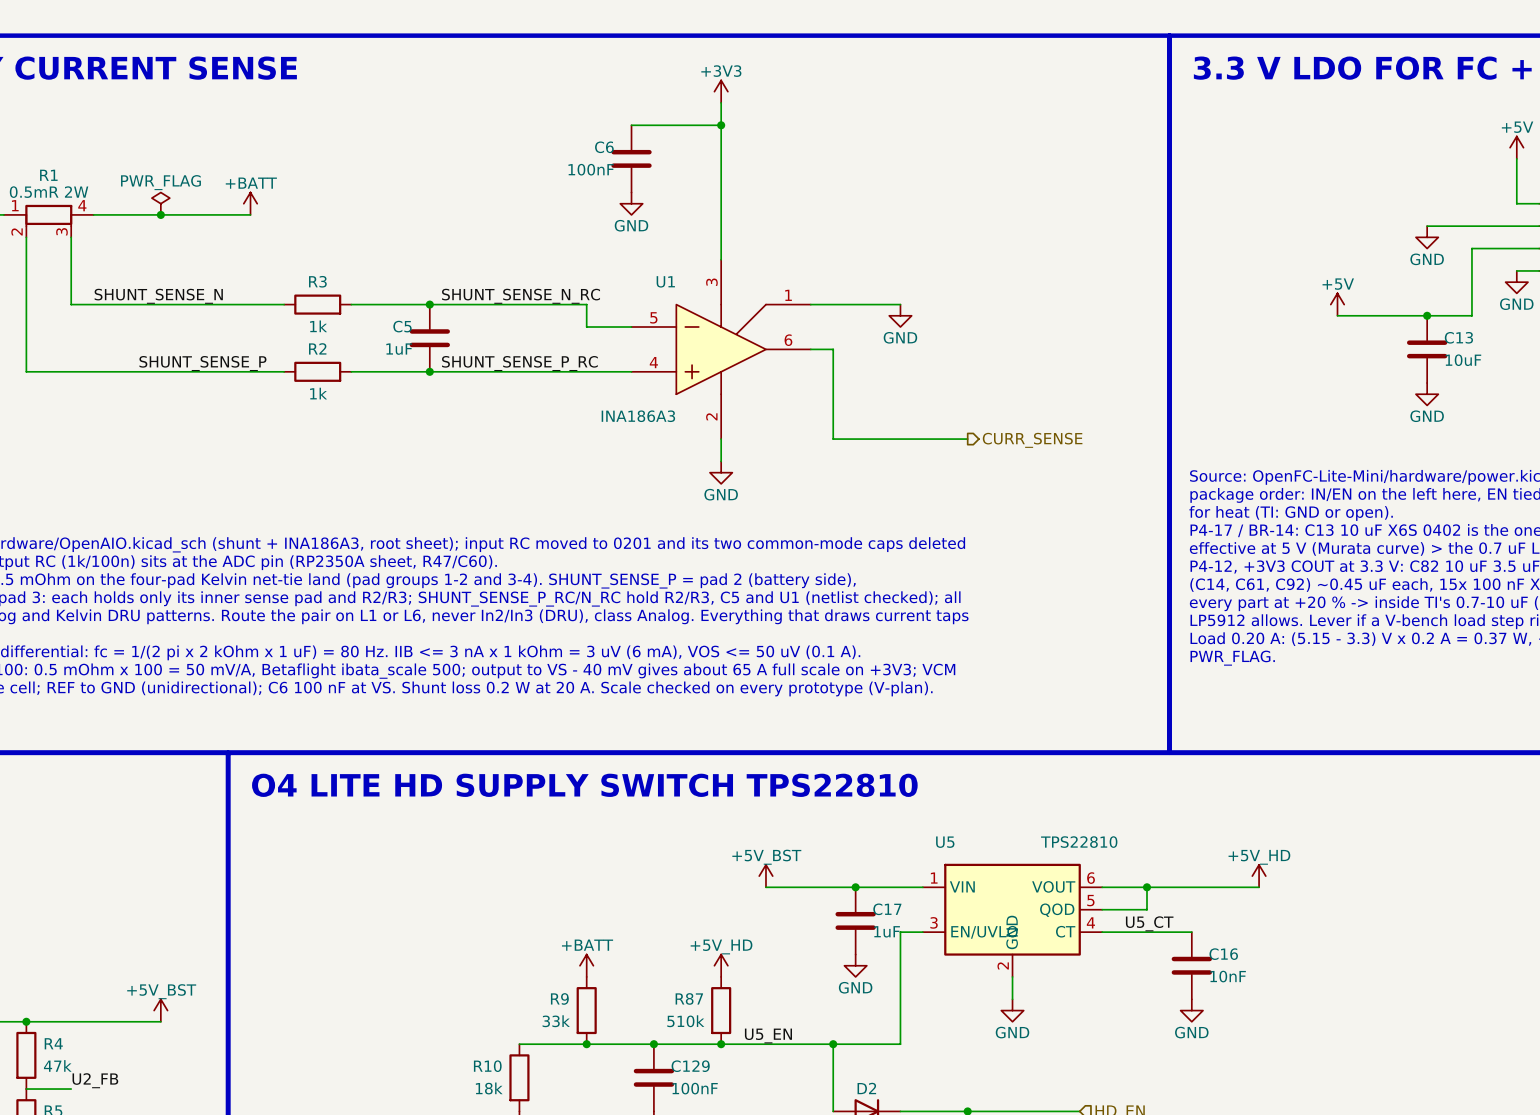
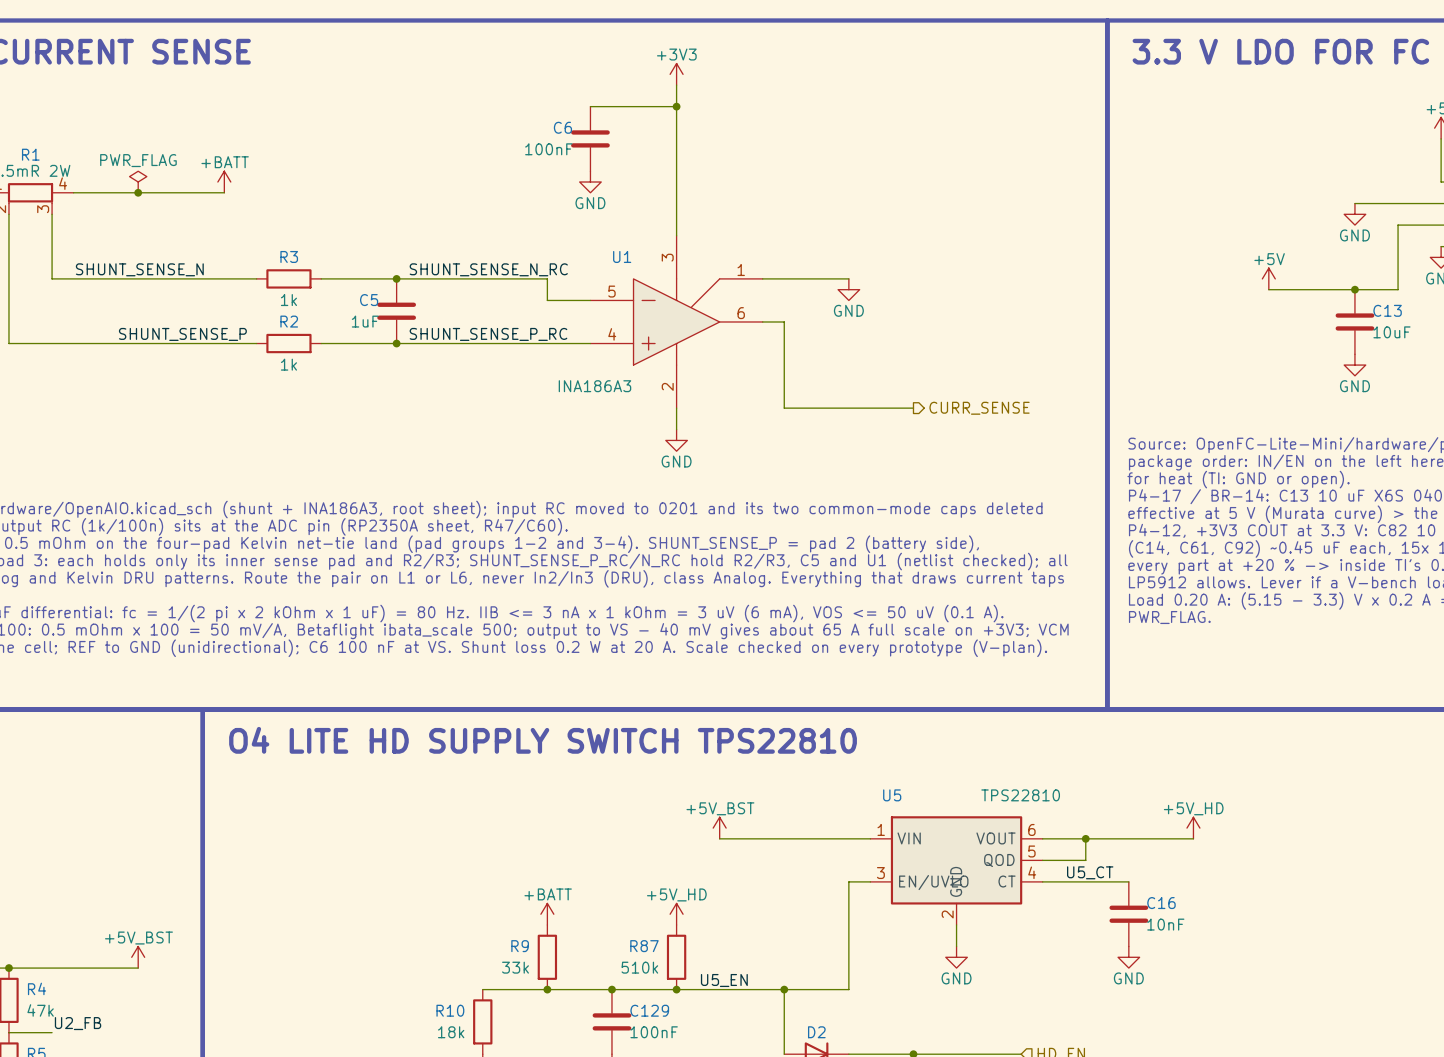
junction: (855, 887) -> none
C17: 1uF (855, 920) -> none
power symbol: GND (855, 965) -> none

